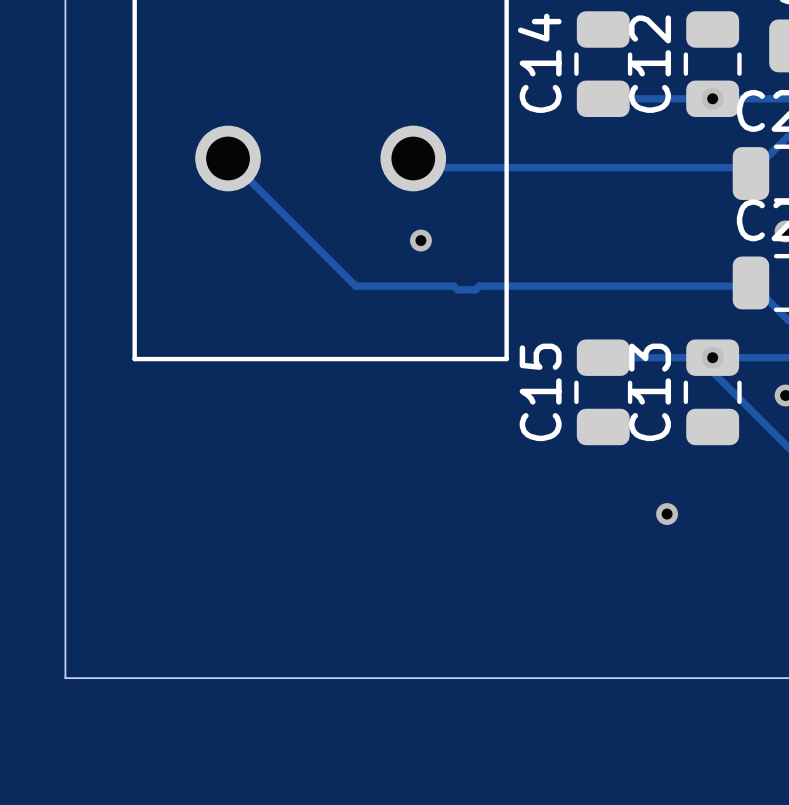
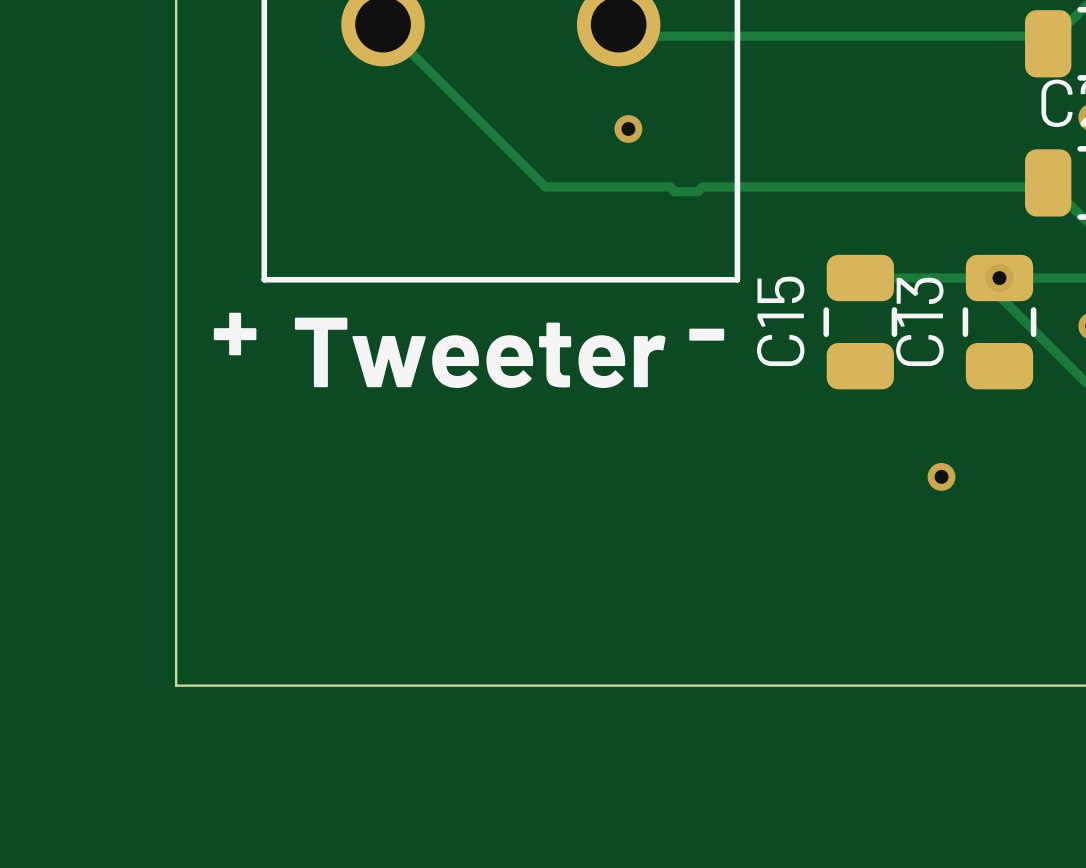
text: none -> + (235, 334)
text: none -> - (706, 334)
text: none -> Tweeter (480, 352)

